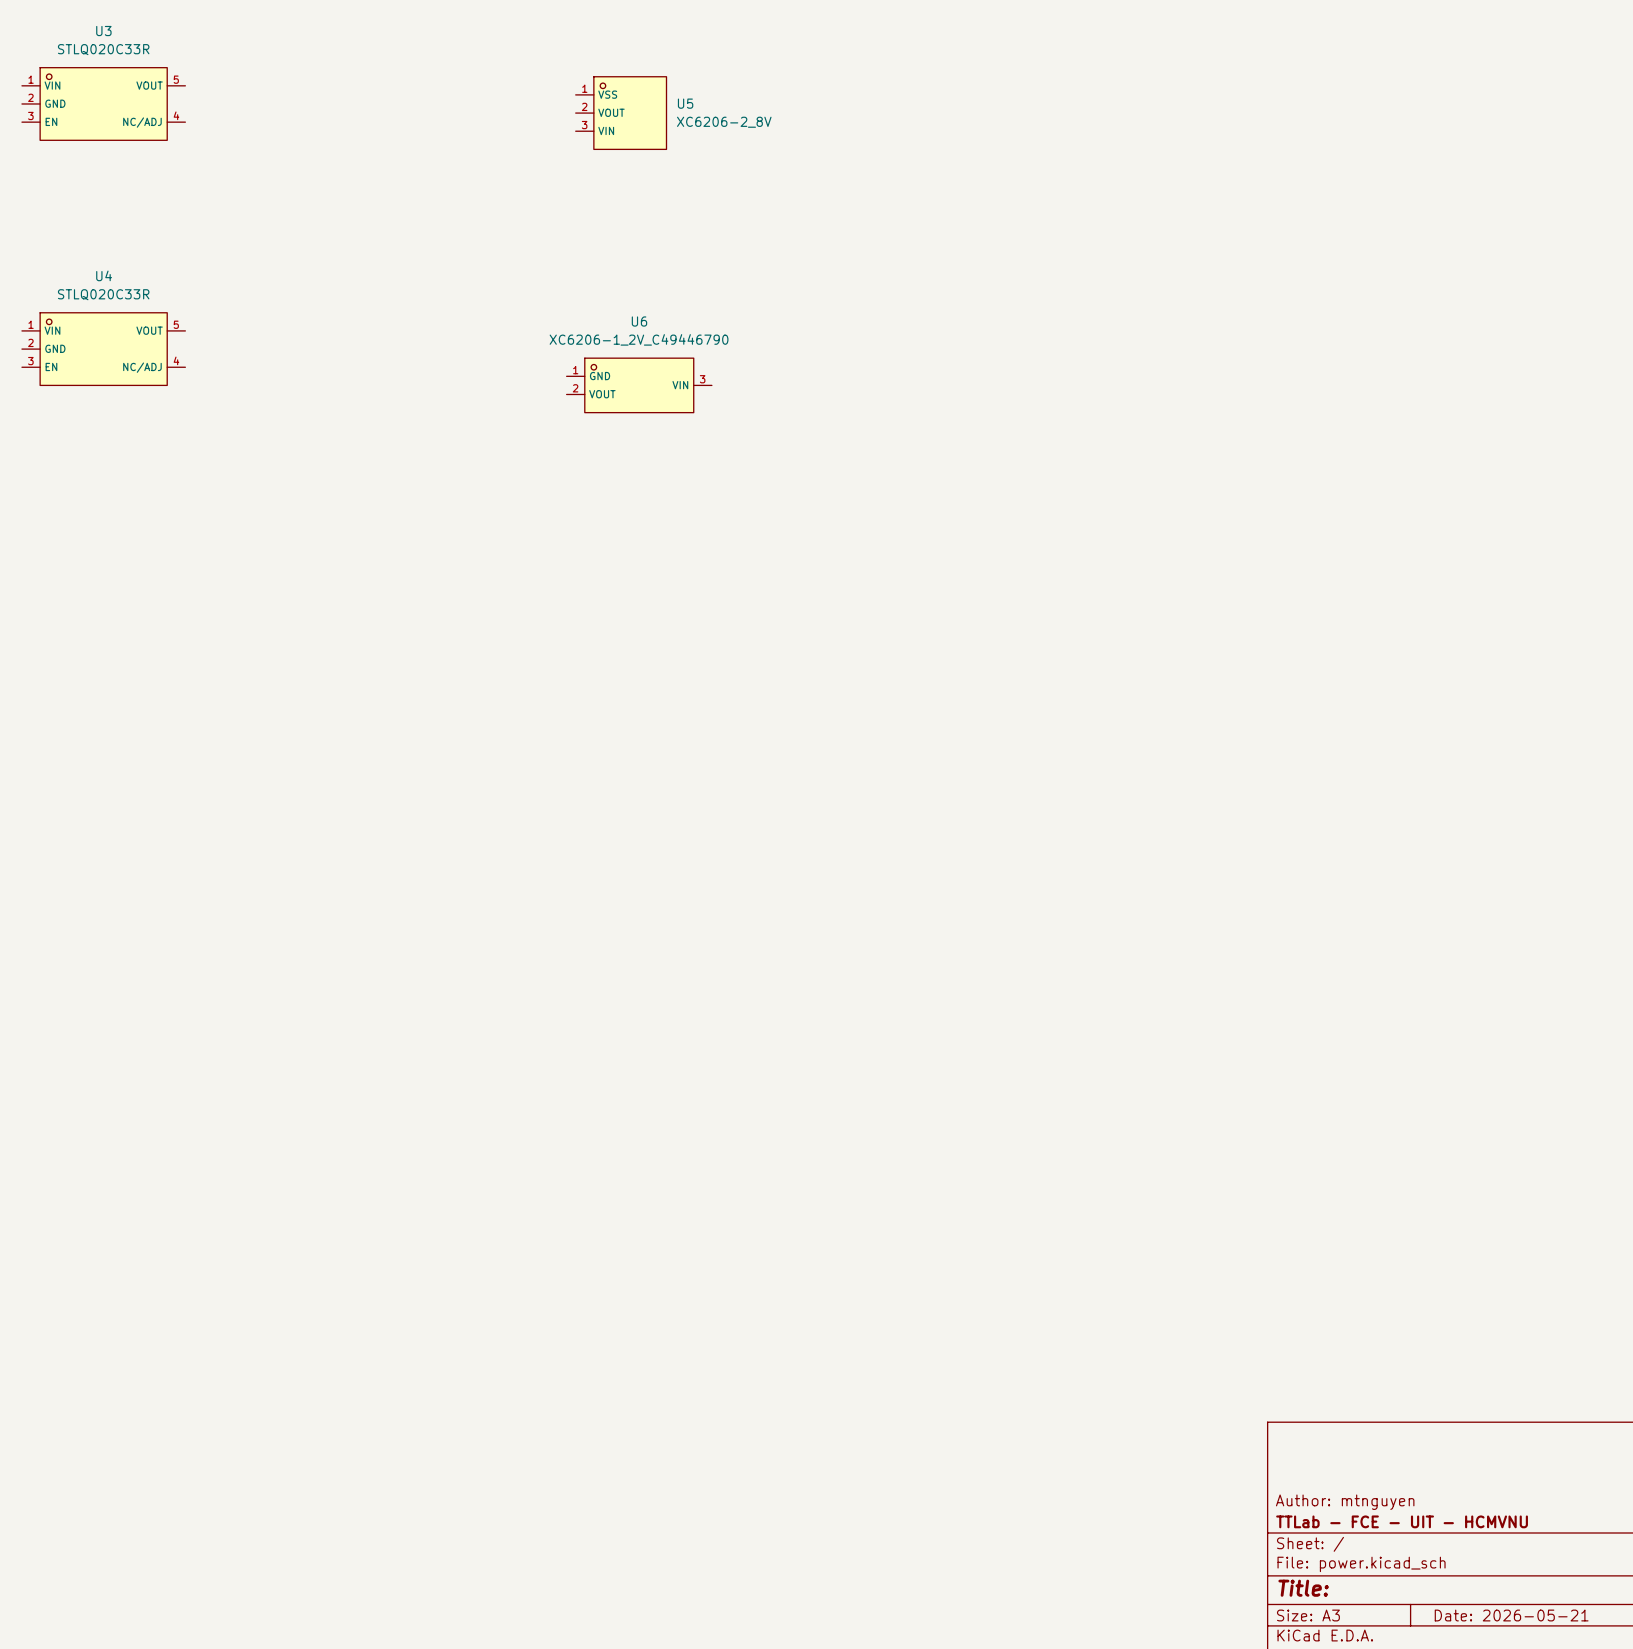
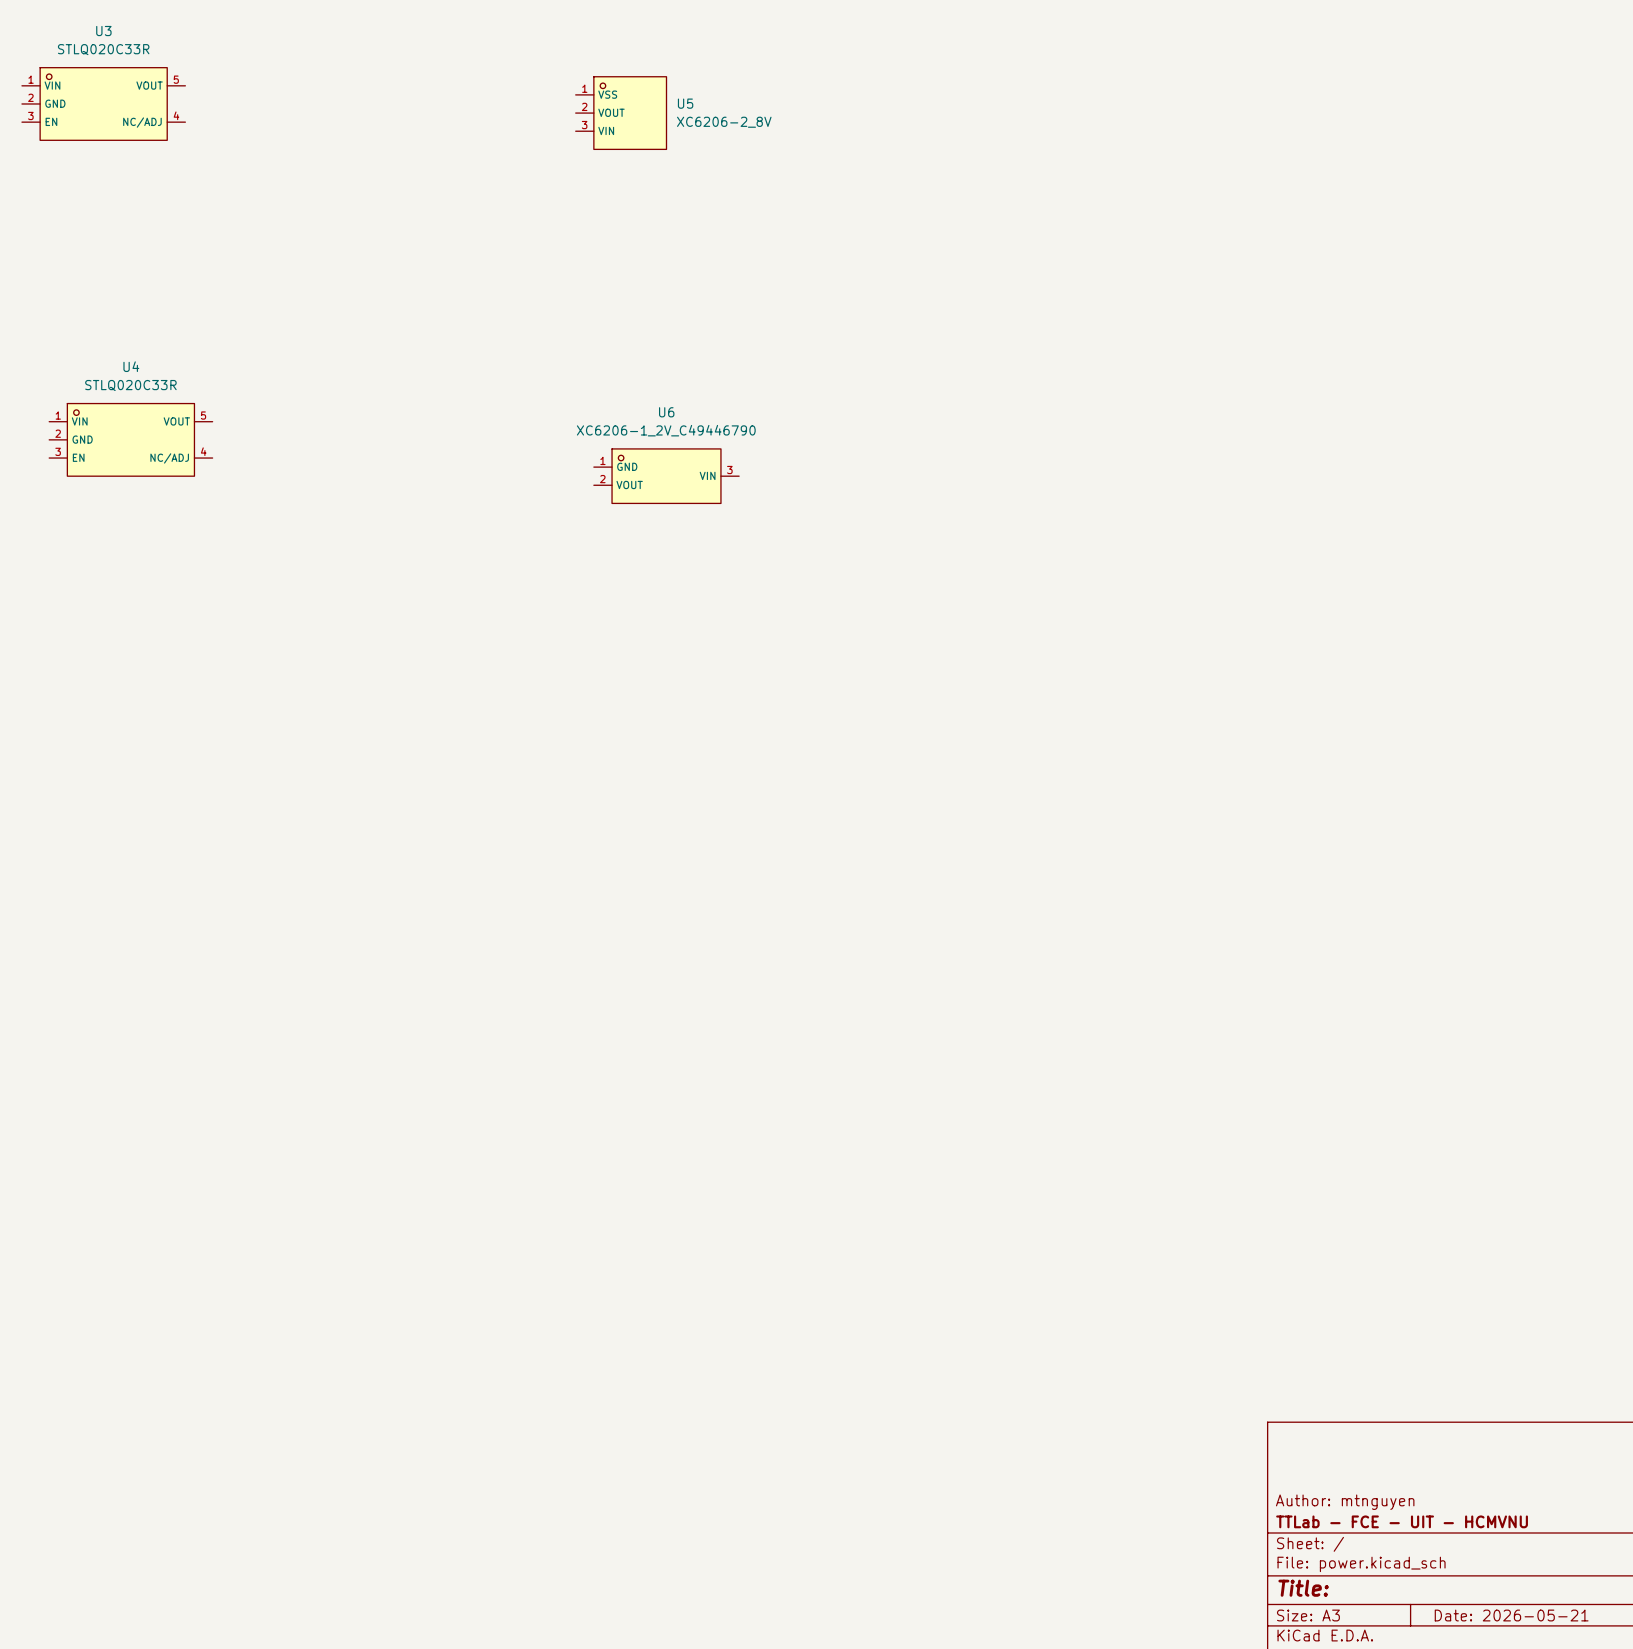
U4 position: (103, 349) -> (130, 439)
U6 position: (639, 385) -> (666, 476)

